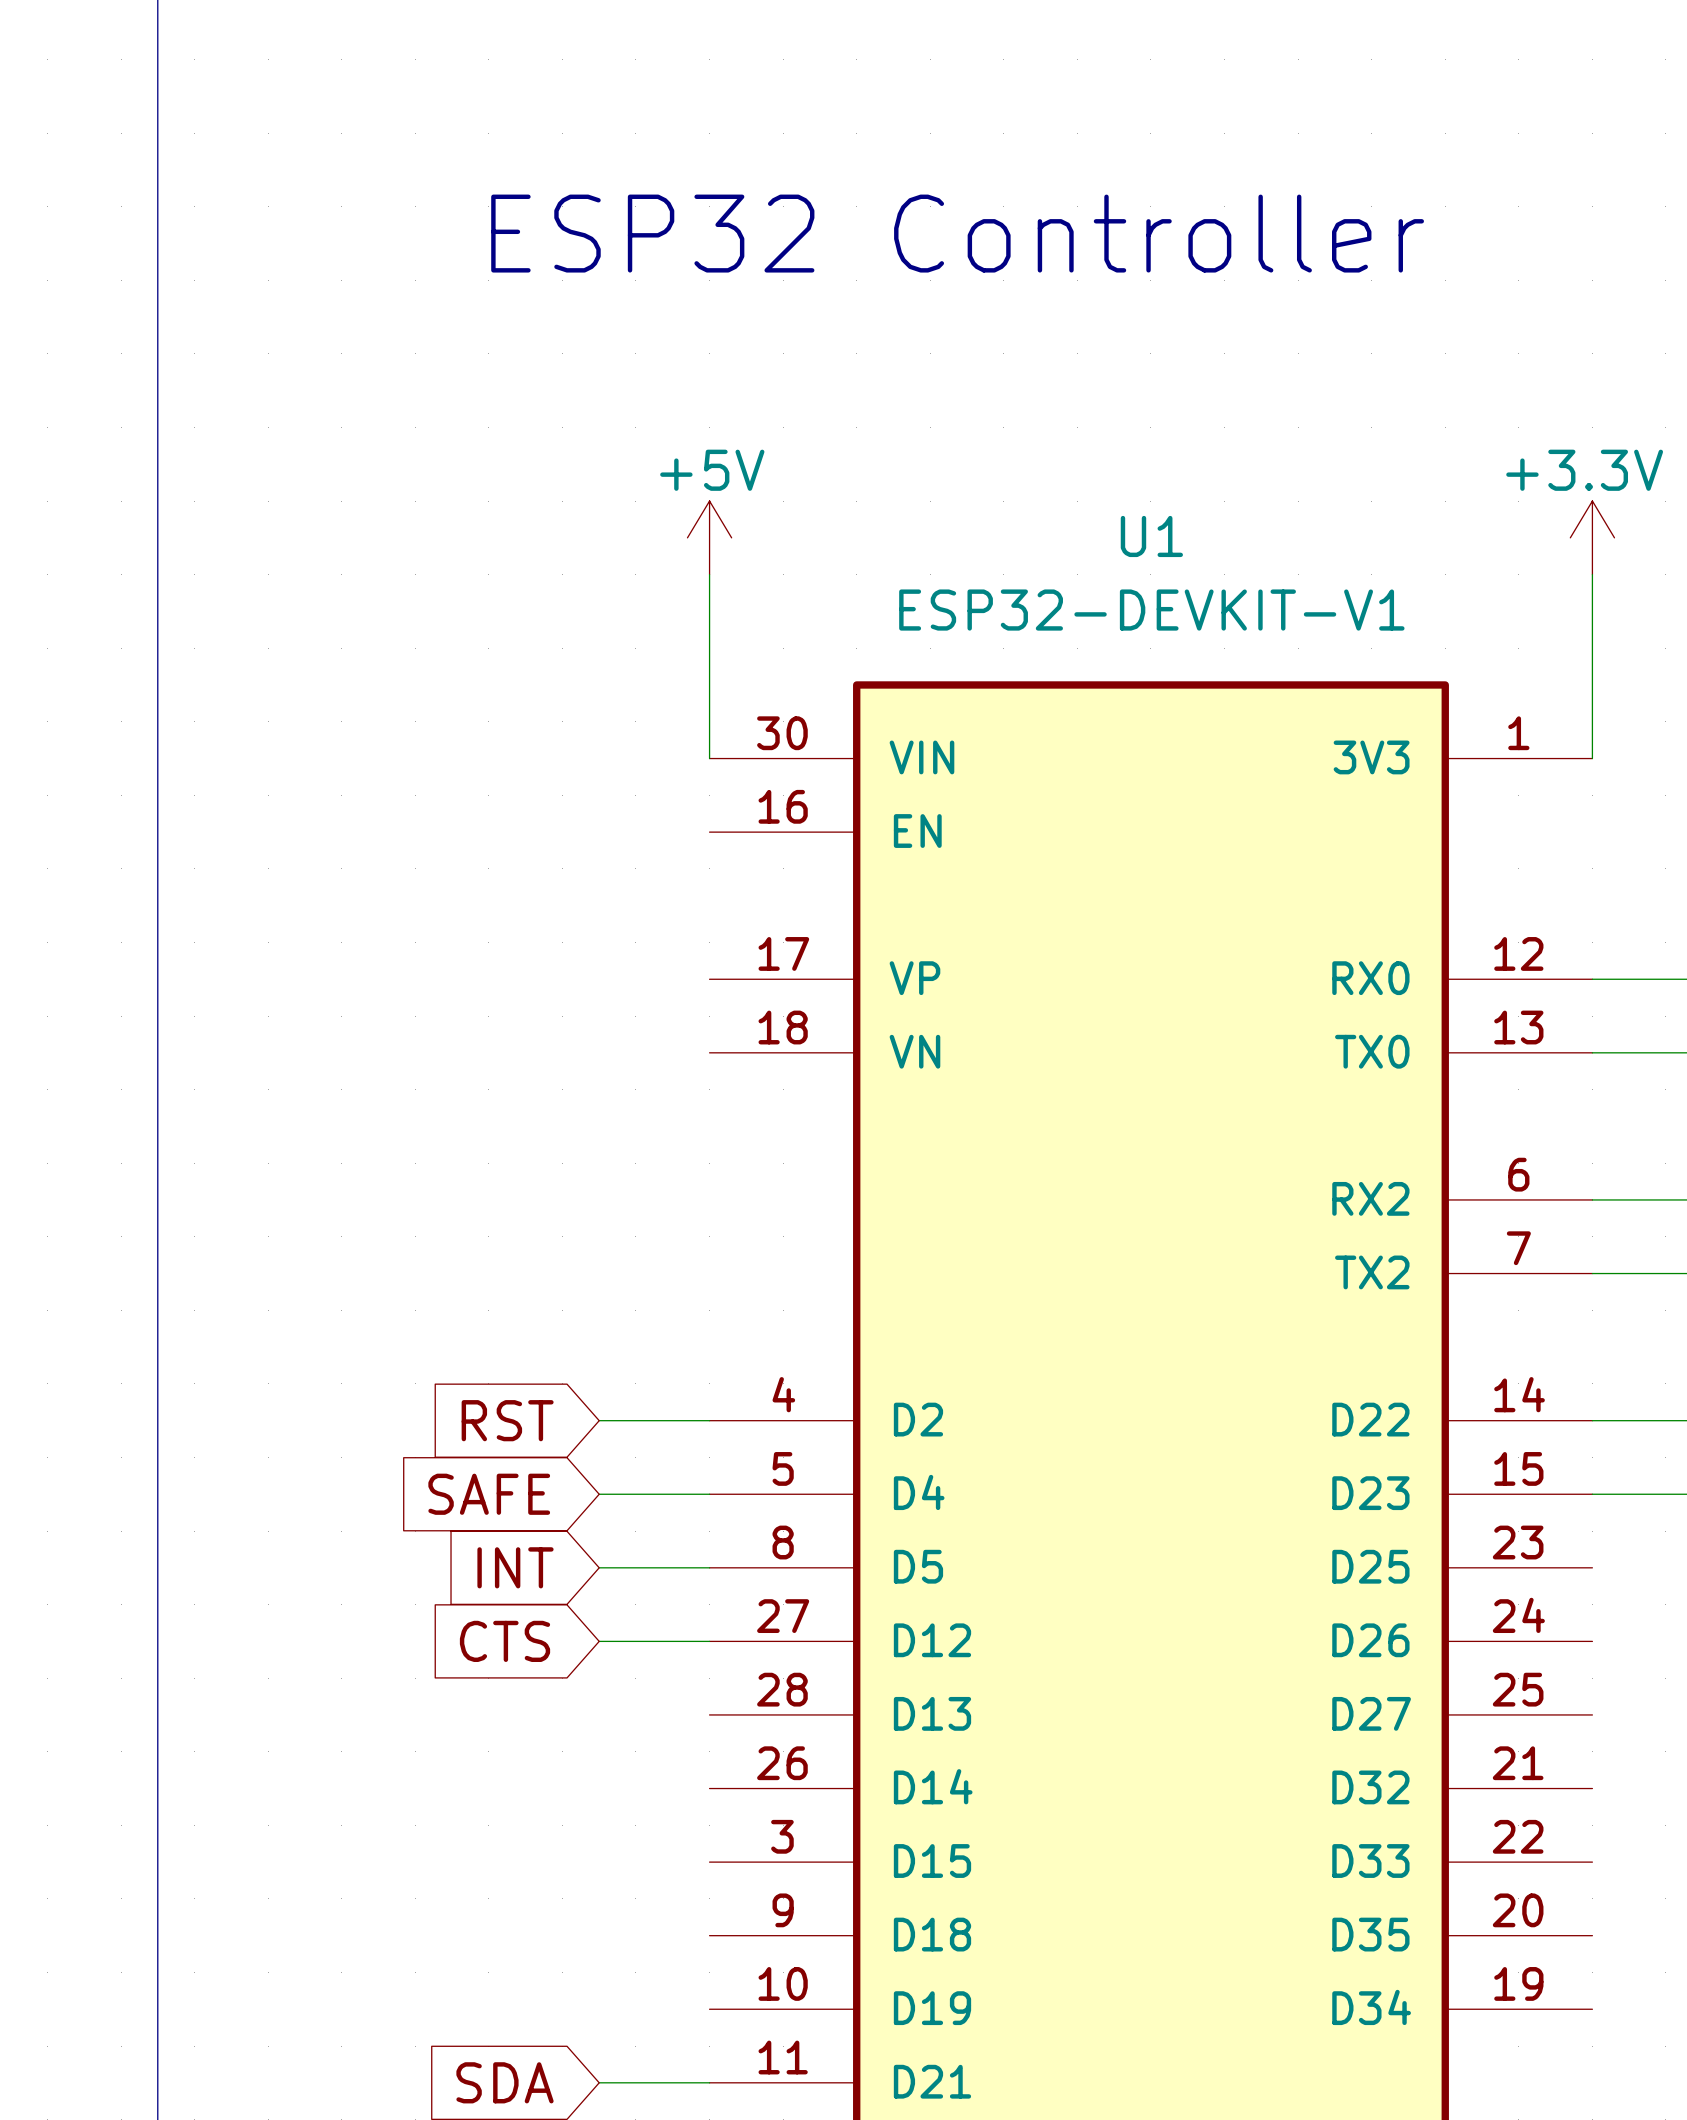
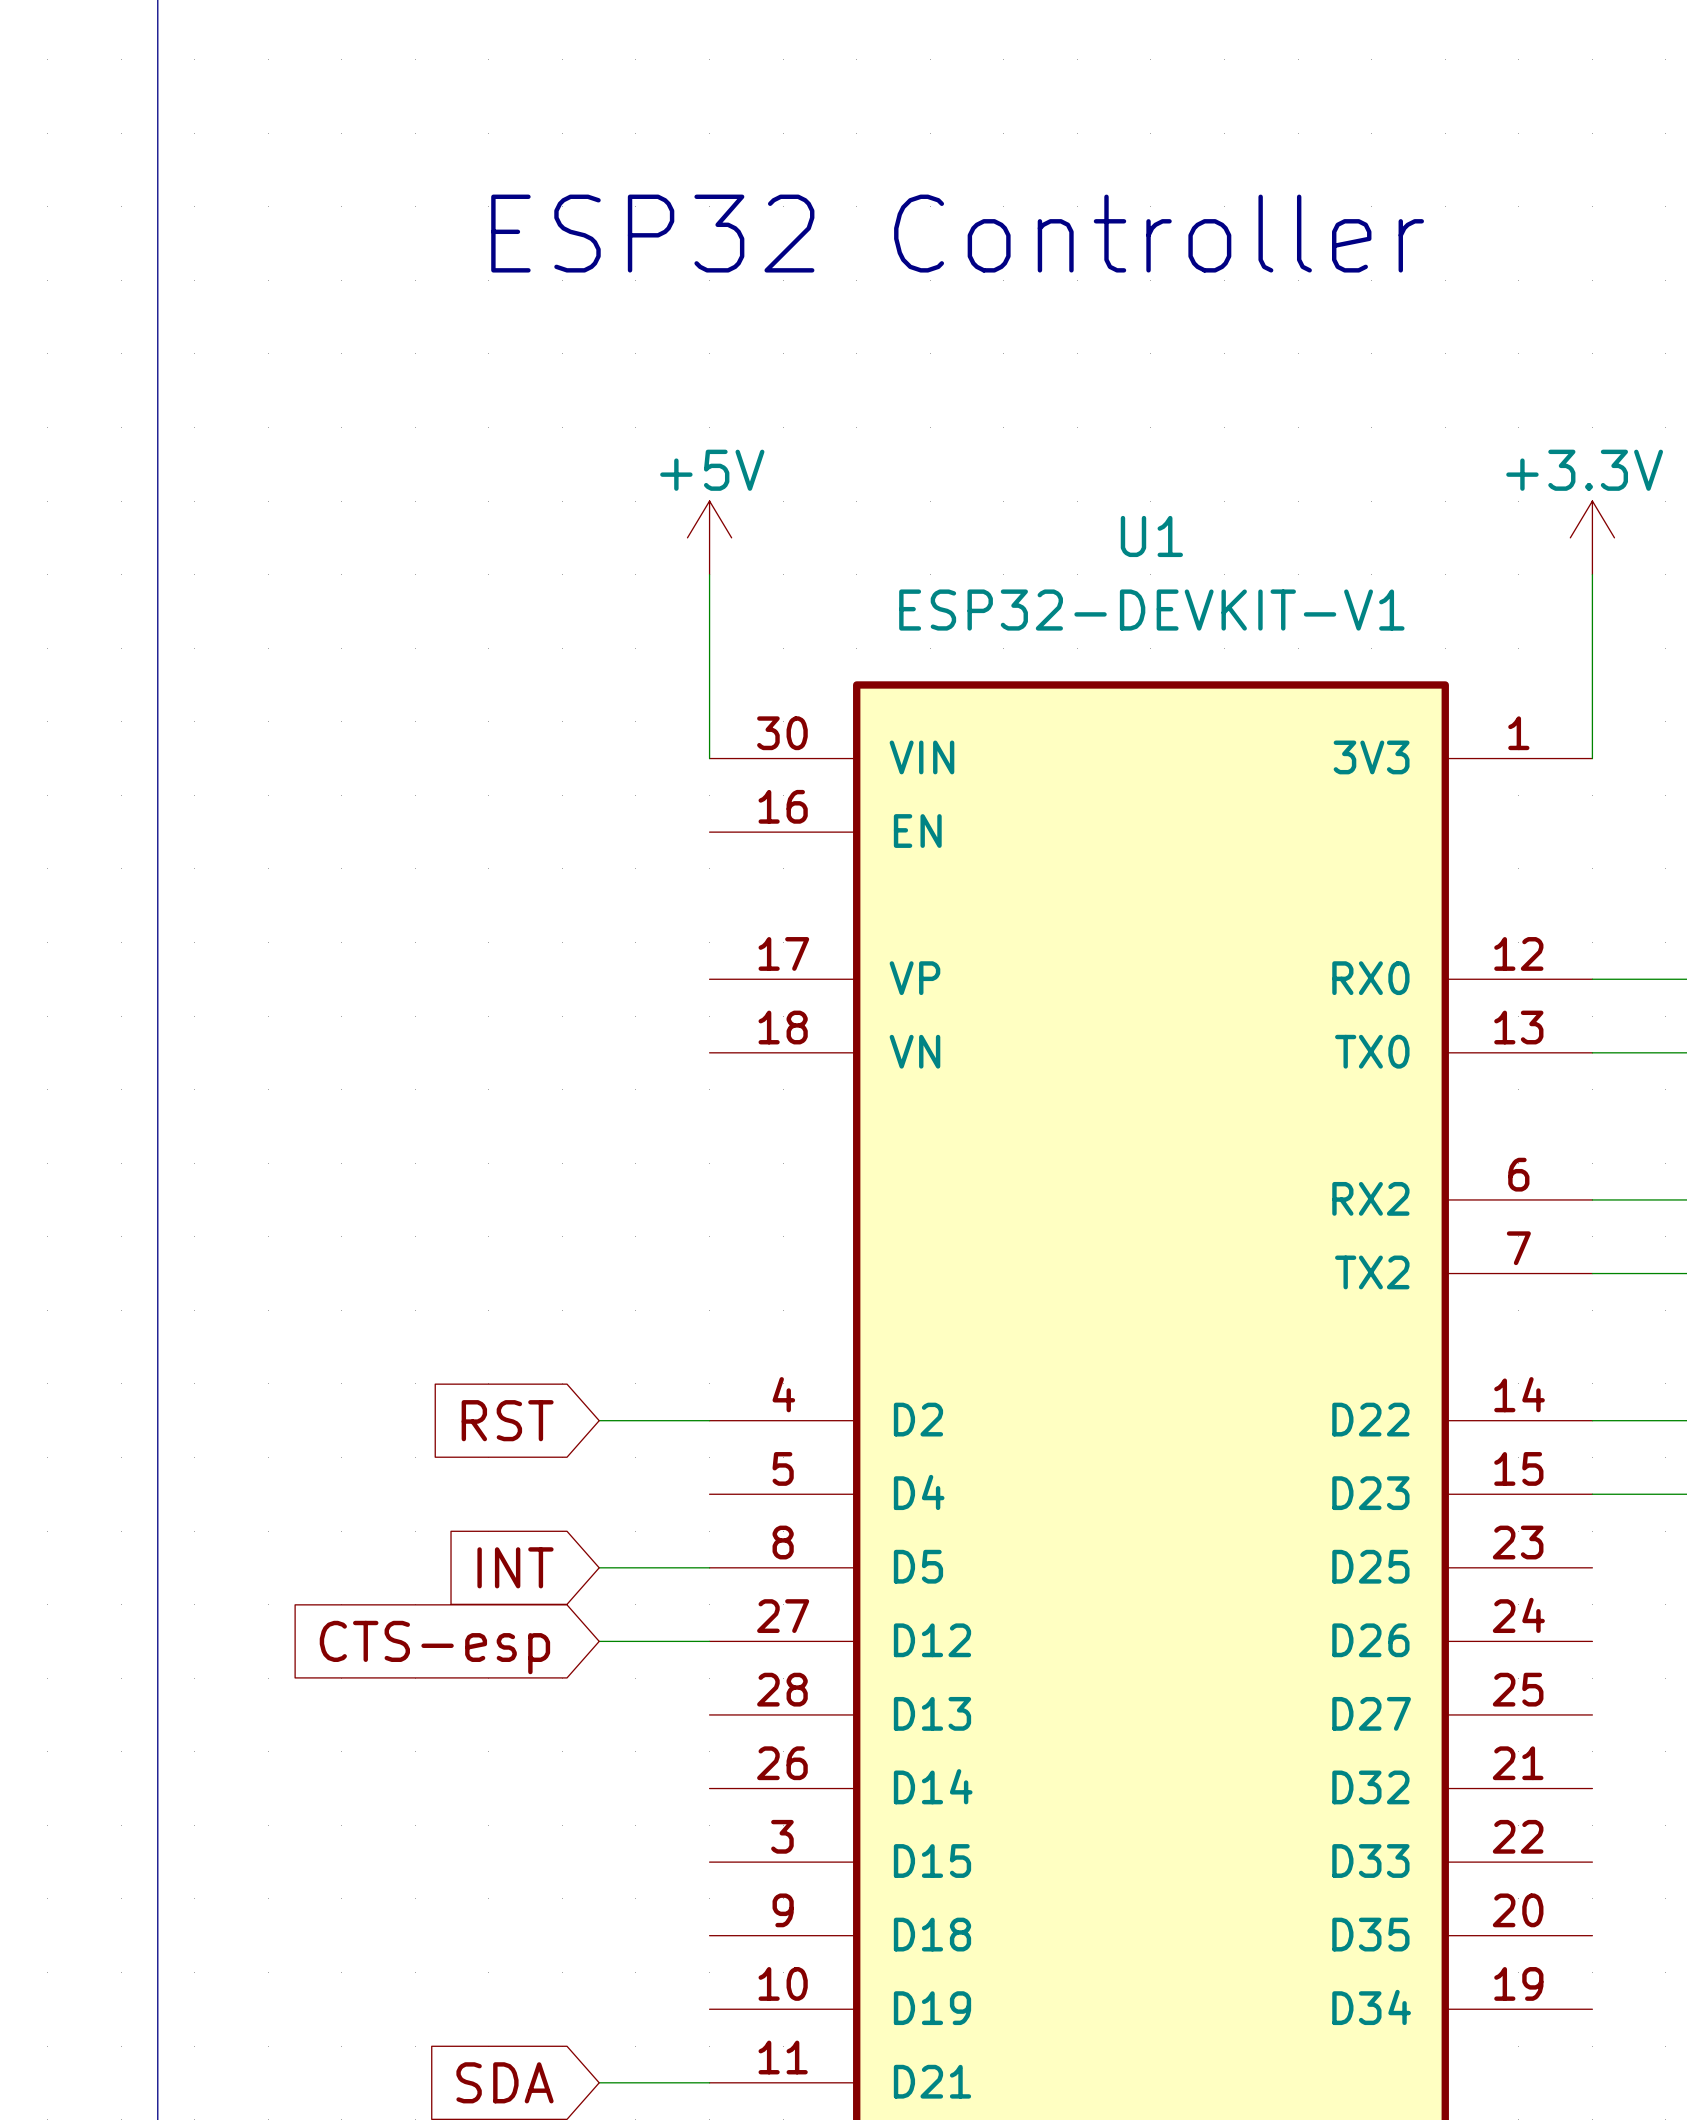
global label: SAFE (489, 1494) -> none
wire: (599, 1494) (709, 1494) -> none
global label: CTS (505, 1641) -> CTS-esp (434, 1647)

